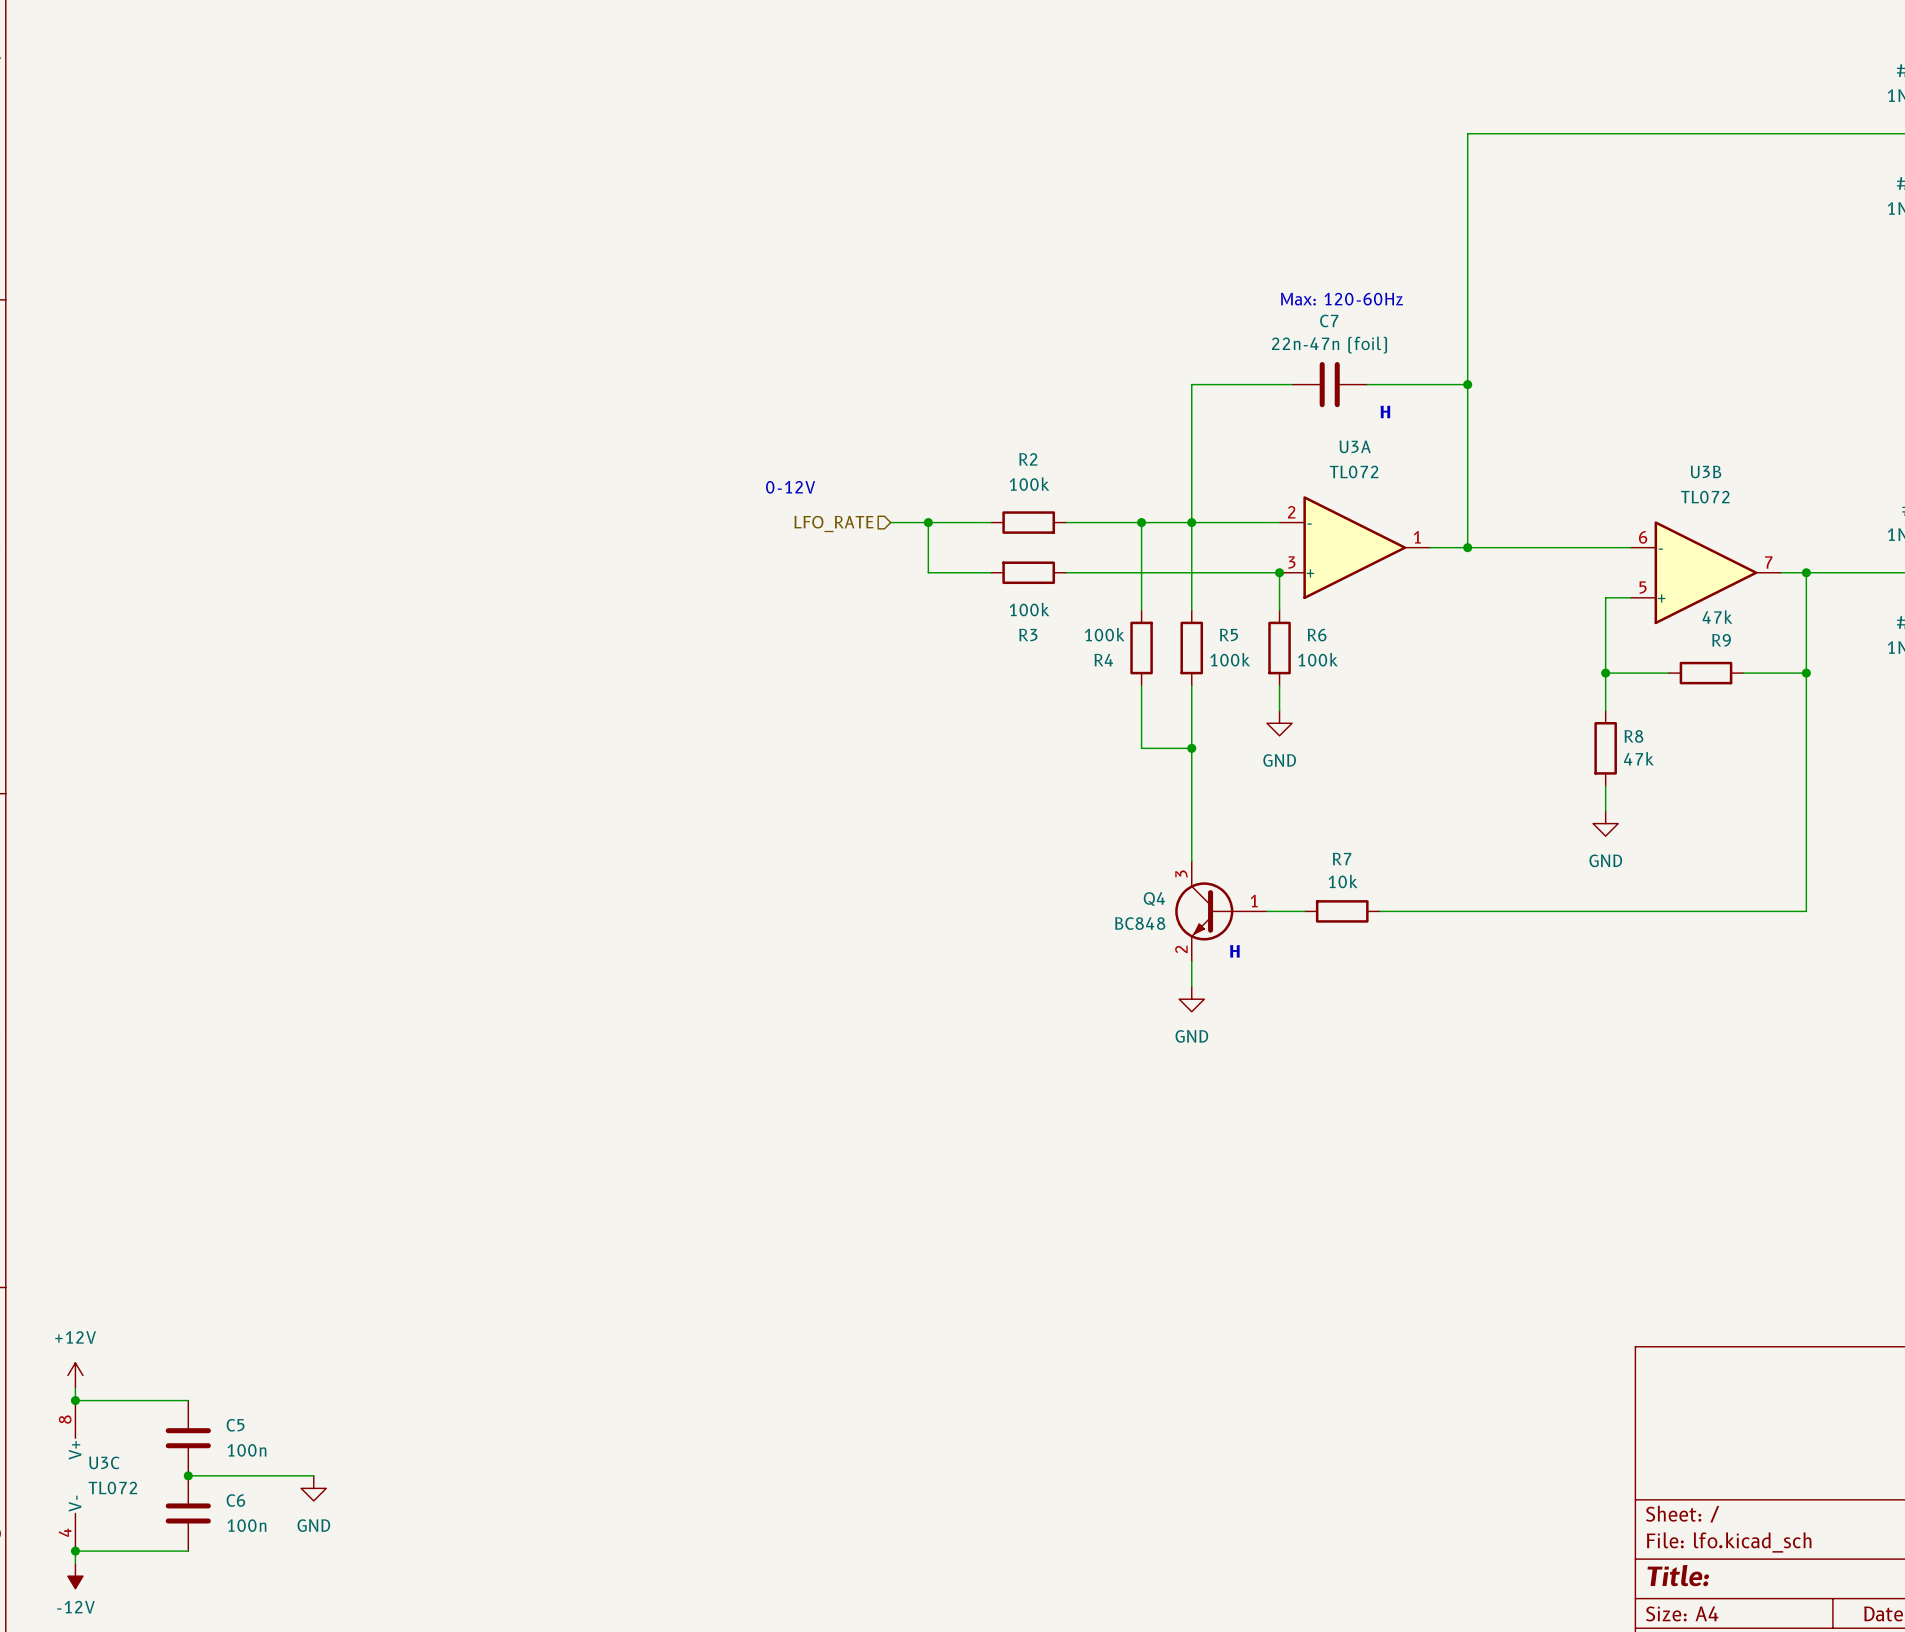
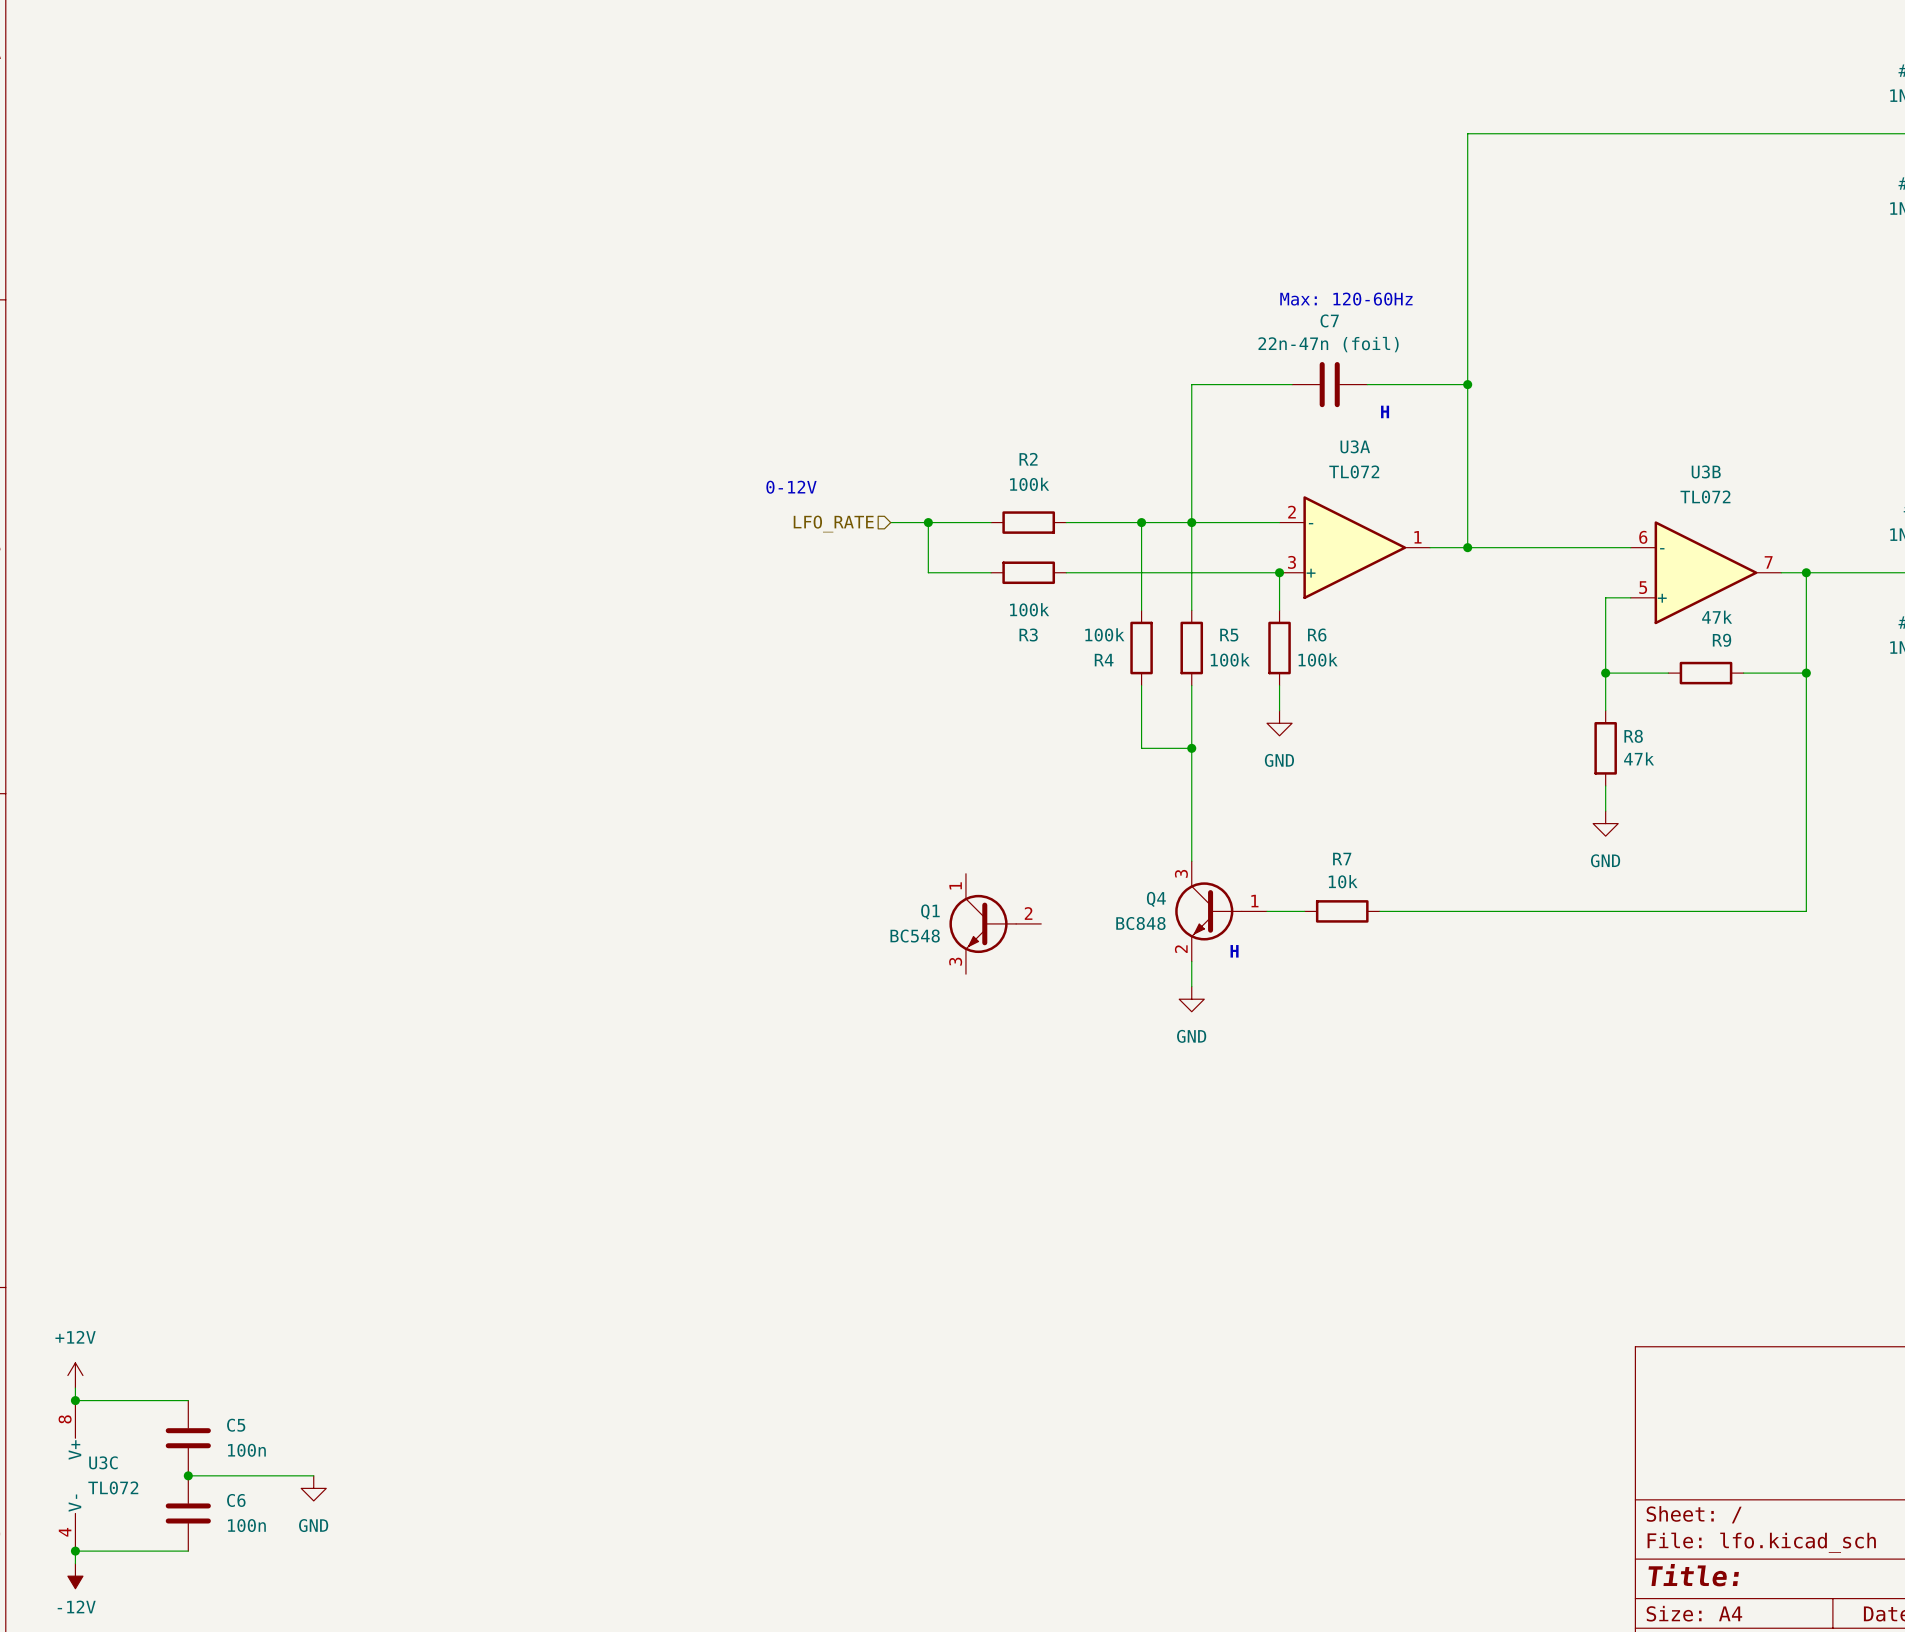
Q1: none -> BC548 (995, 923)

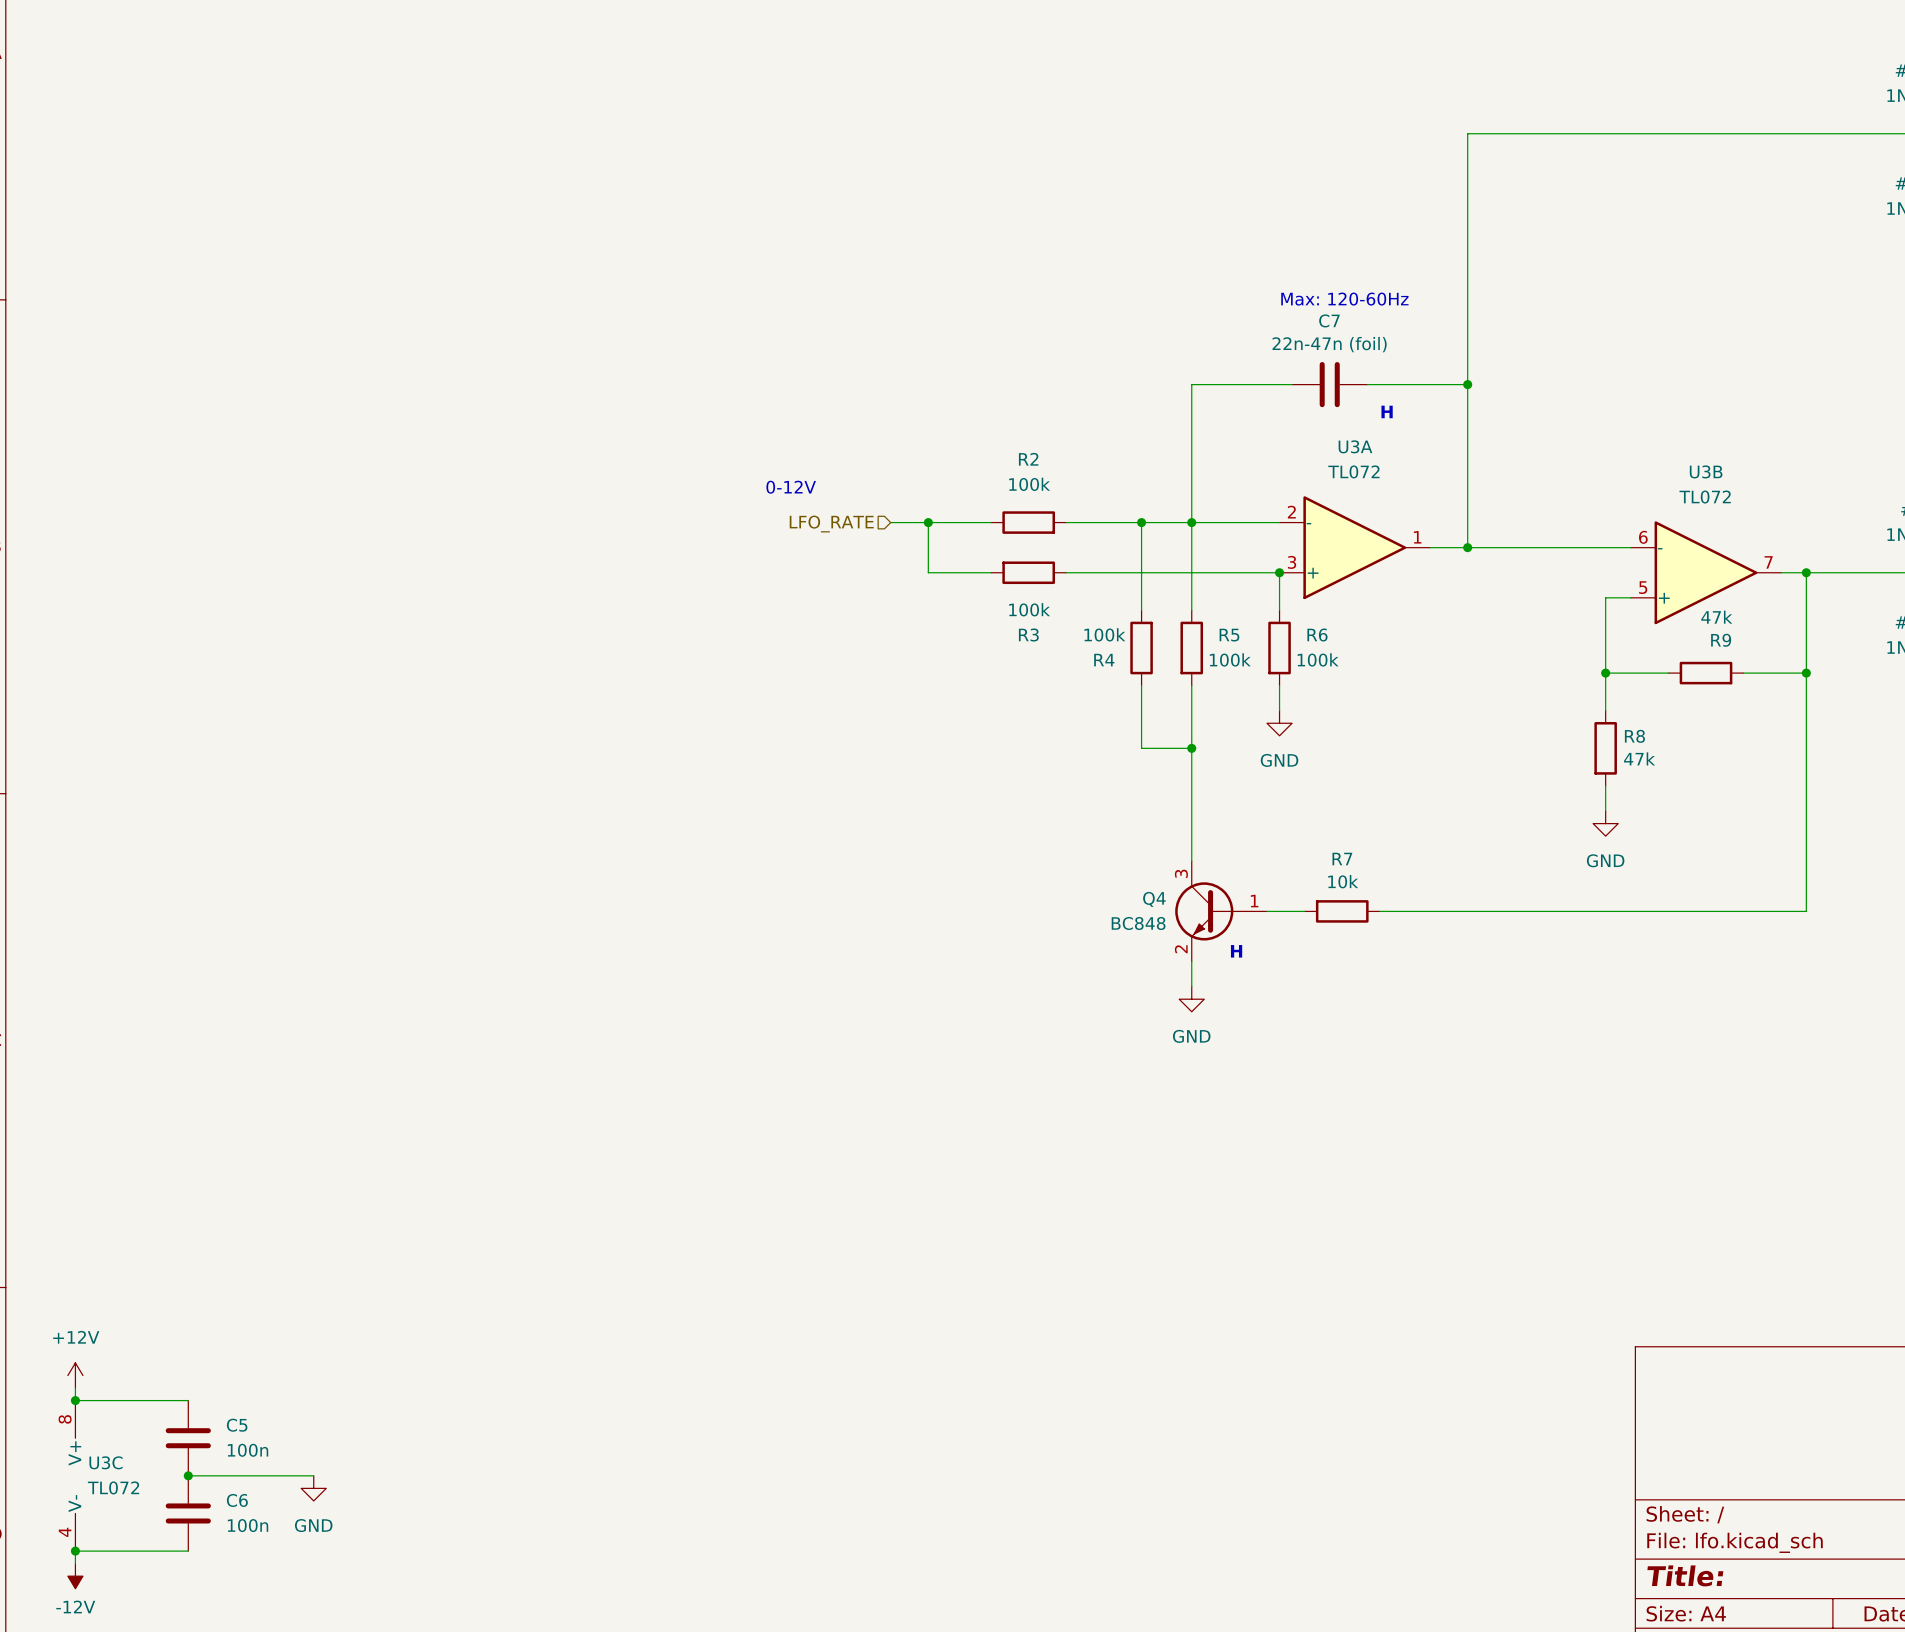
Q1: BC548 (995, 923) -> none

